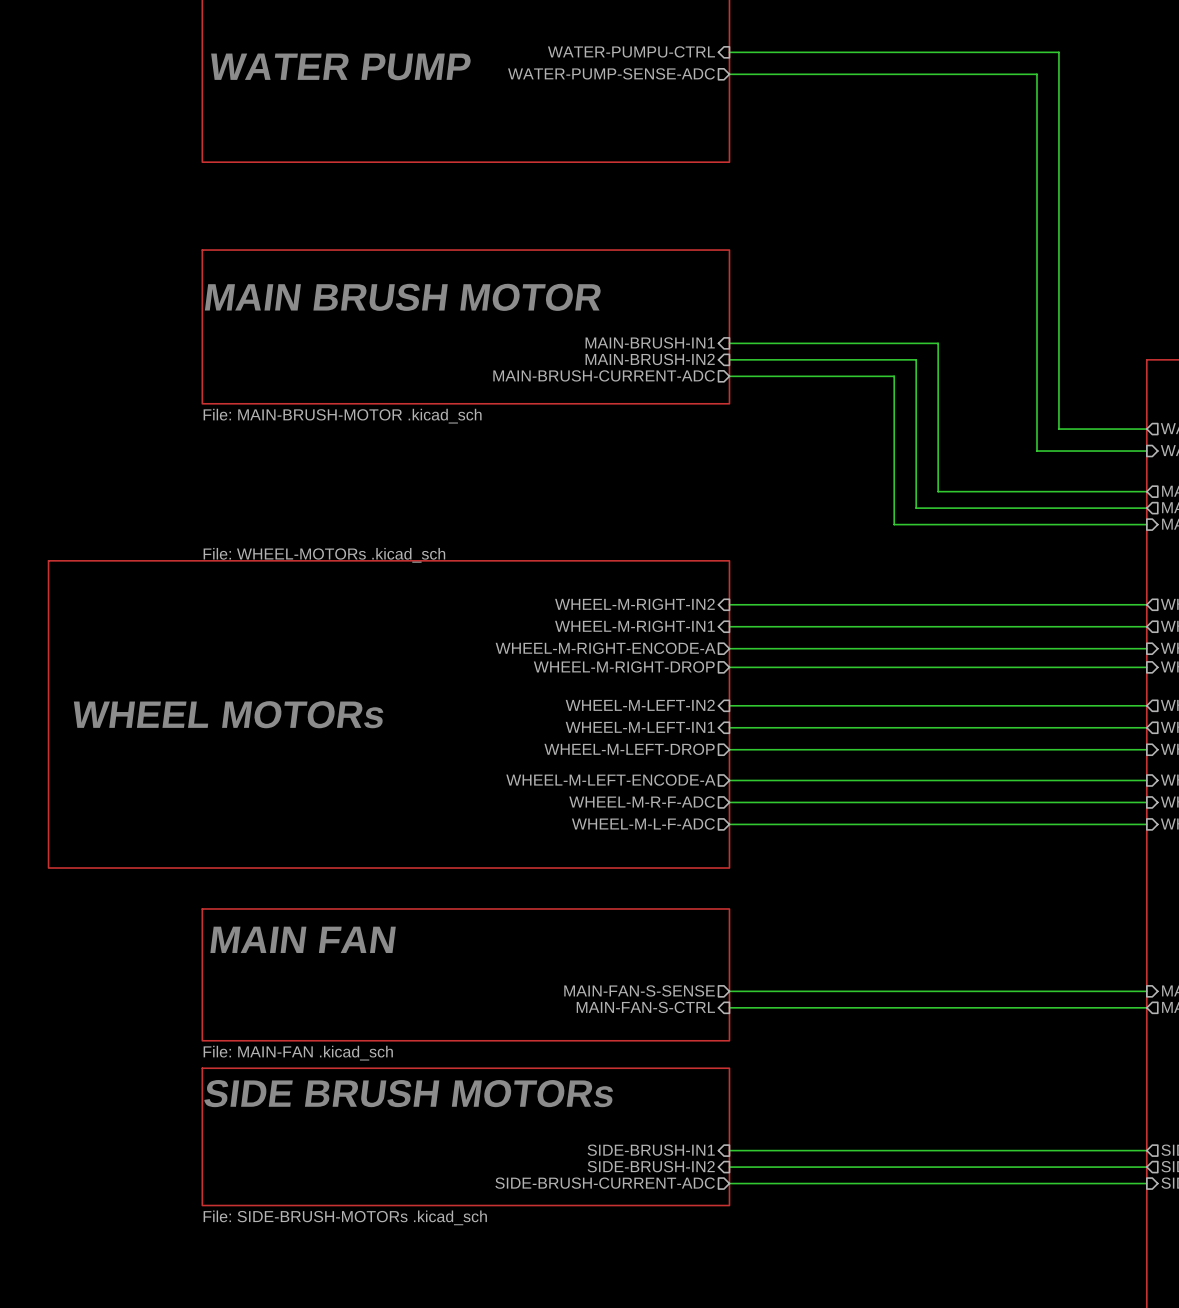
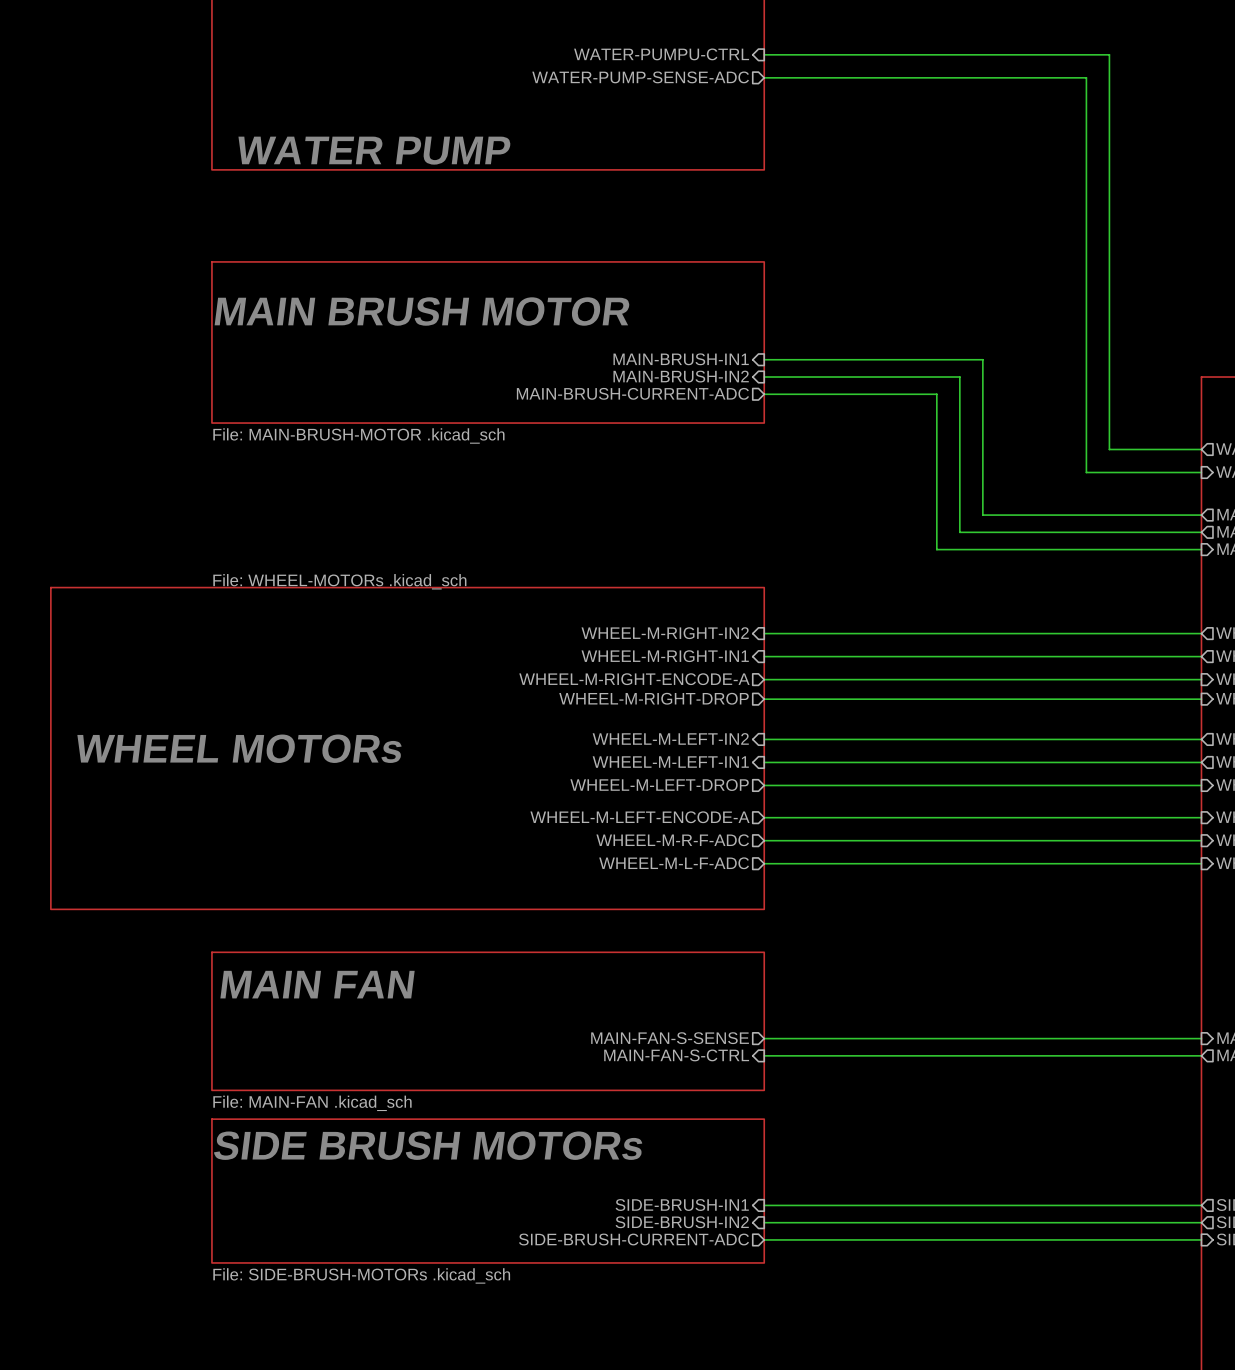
text position: WATER PUMP (341, 66) -> WATER PUMP (374, 150)

